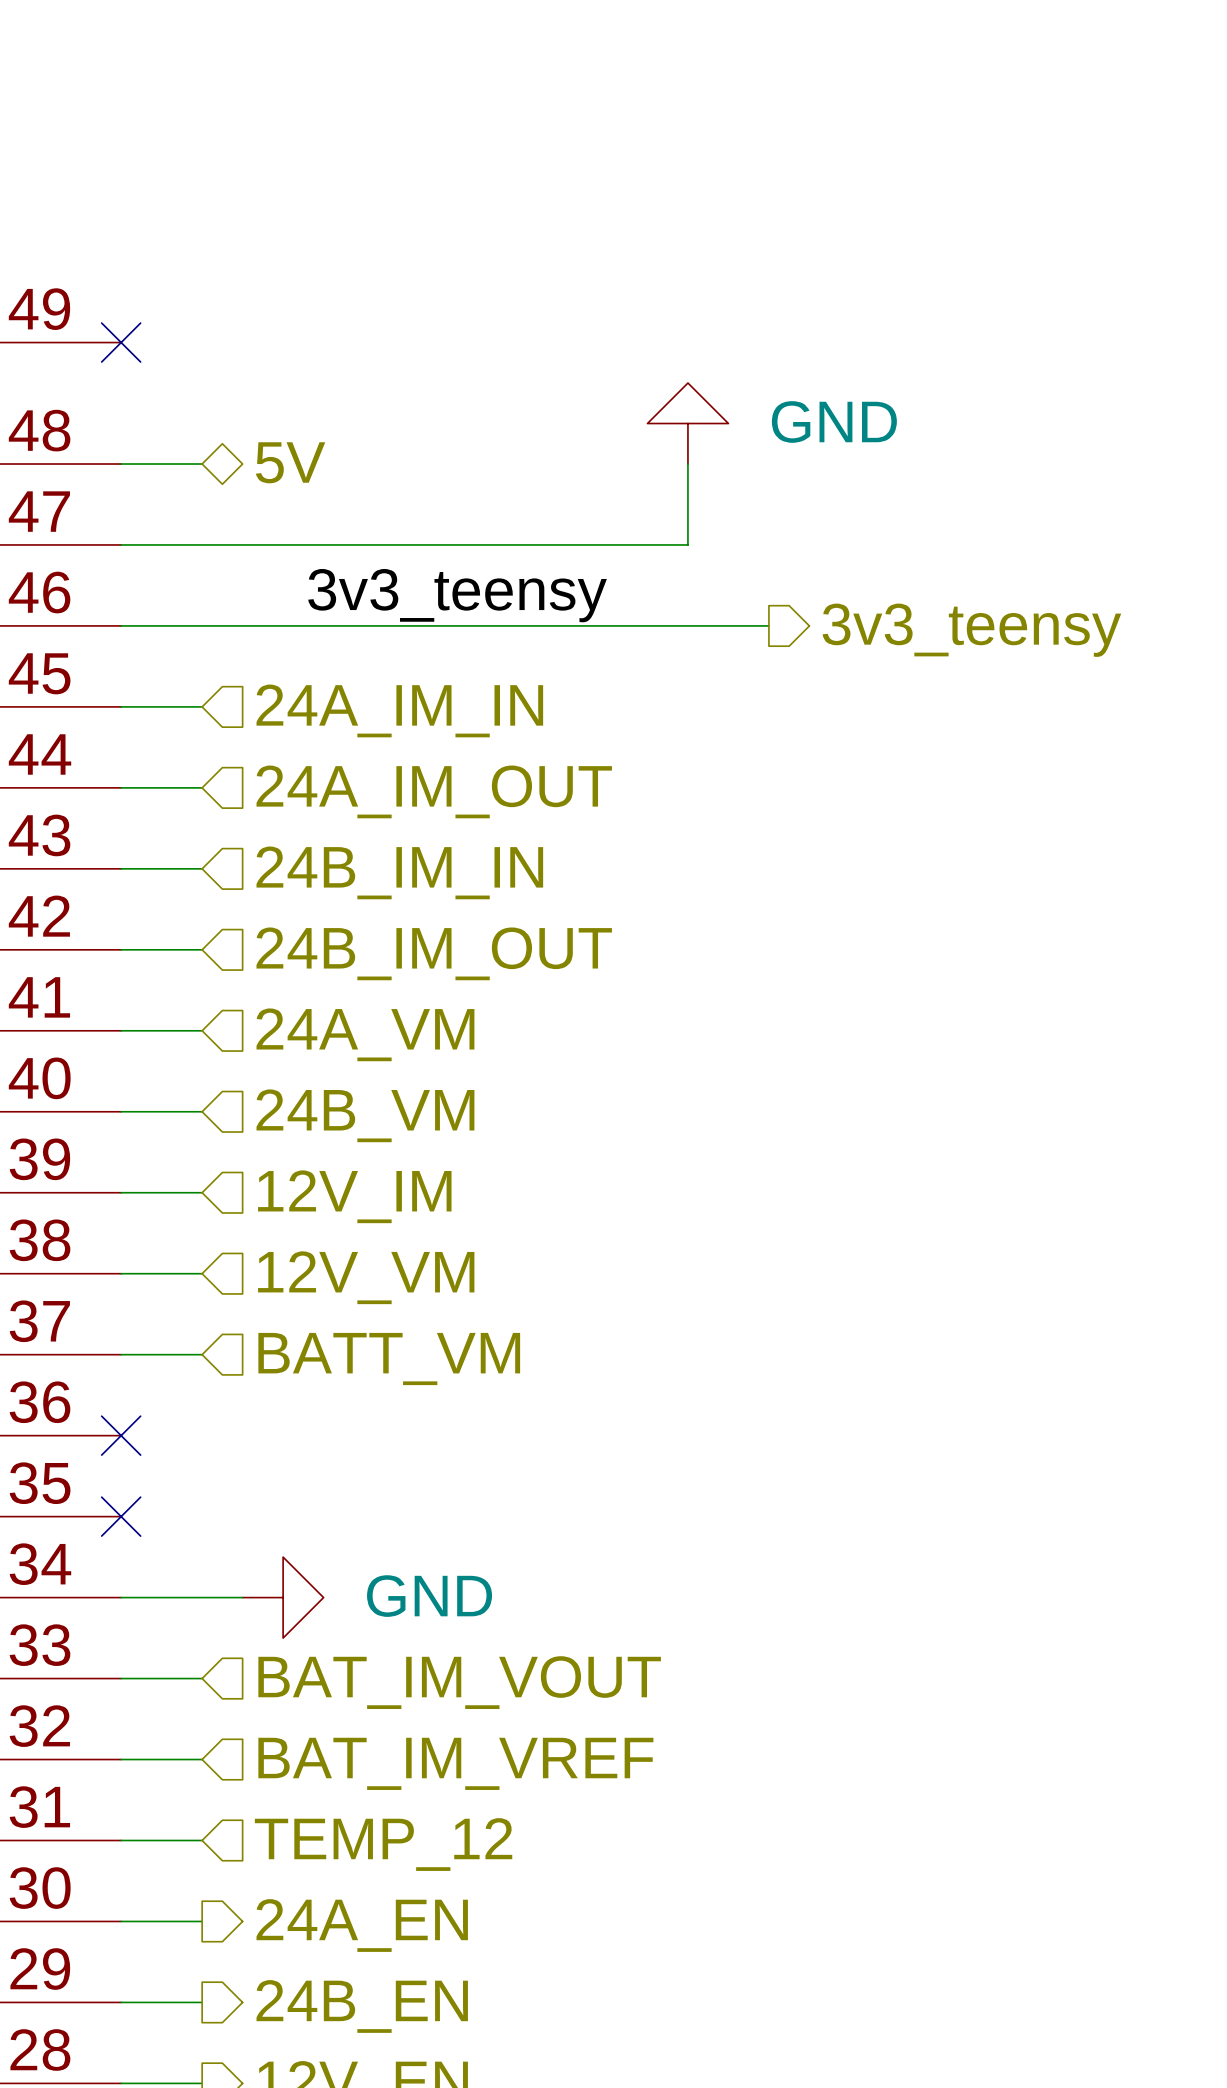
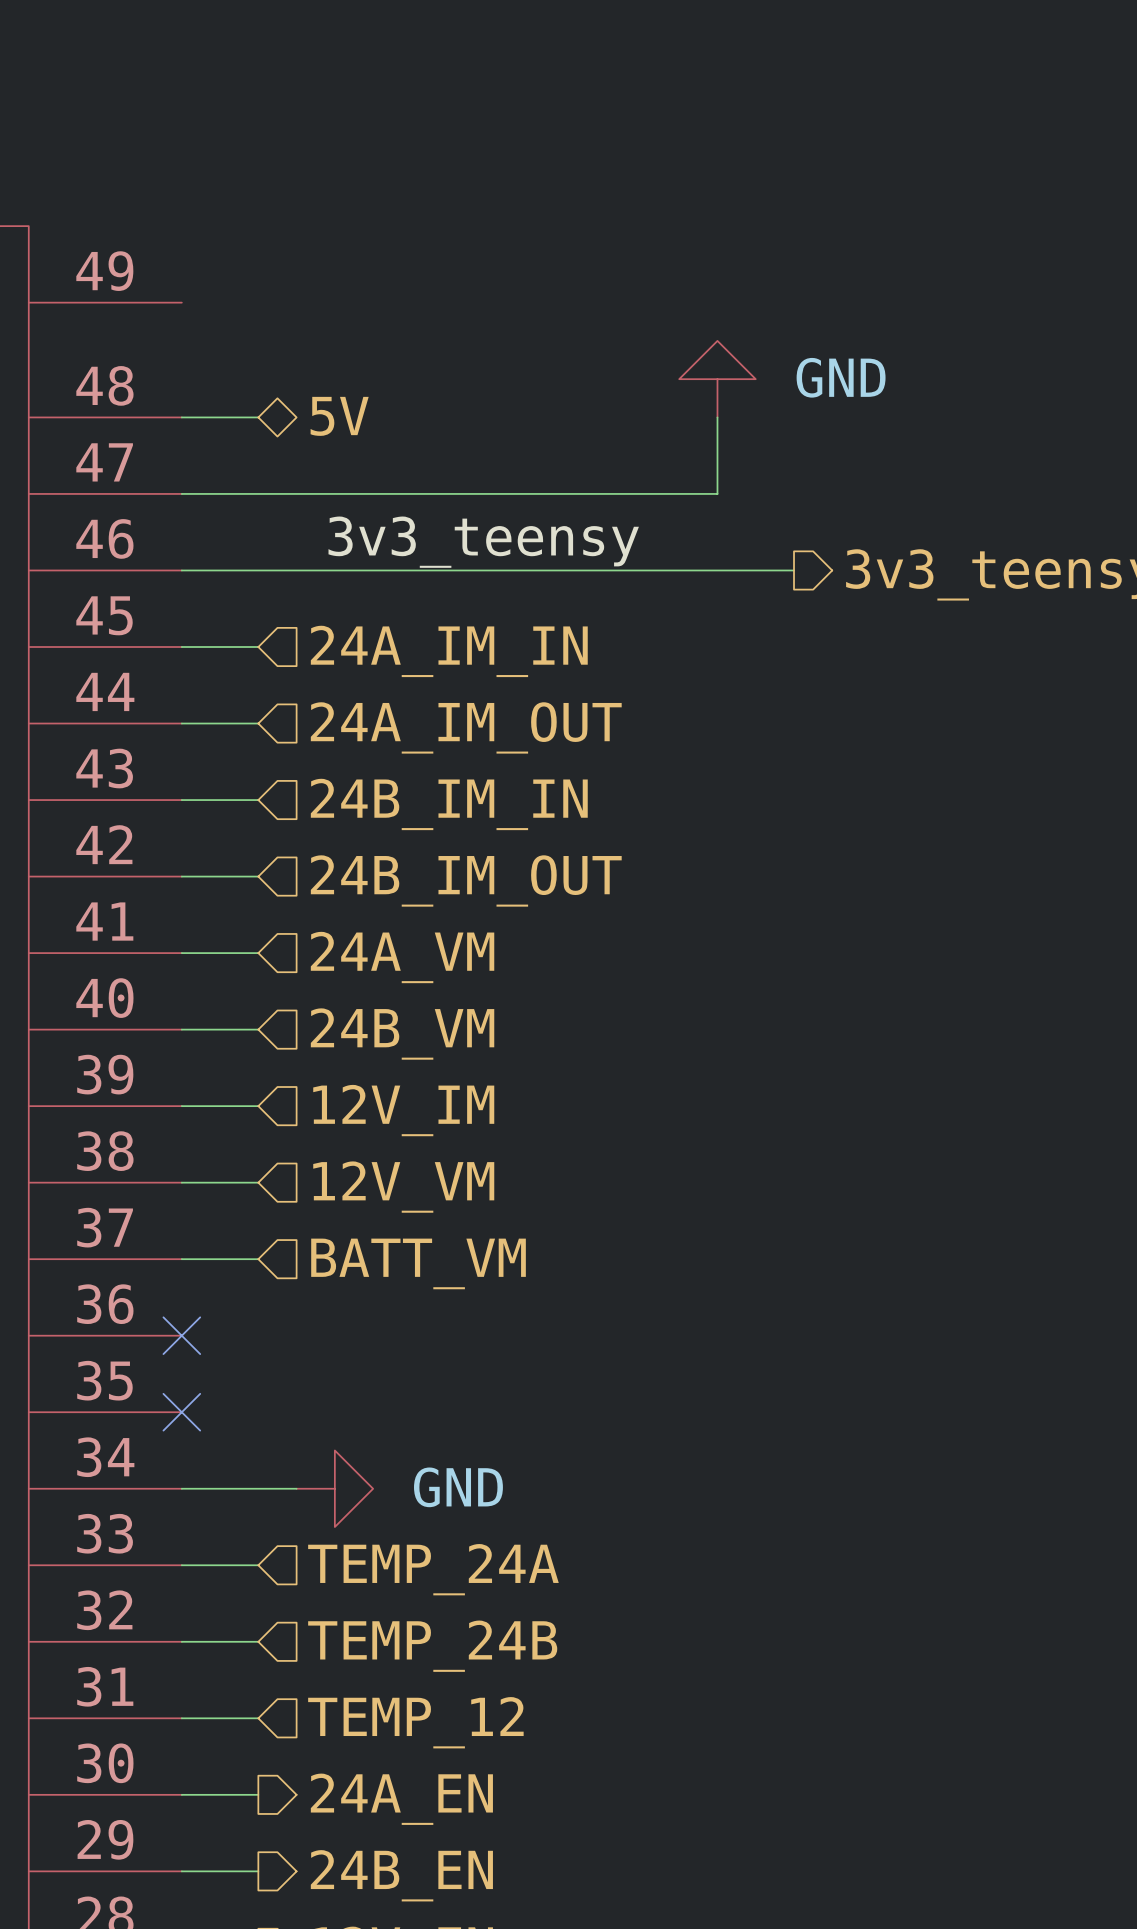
no-connect mark: (121, 342) -> none
hierarchical label: BAT_IM_VOUT (459, 1682) -> TEMP_24A (433, 1569)
hierarchical label: BAT_IM_VREF (455, 1763) -> TEMP_24B (432, 1646)

